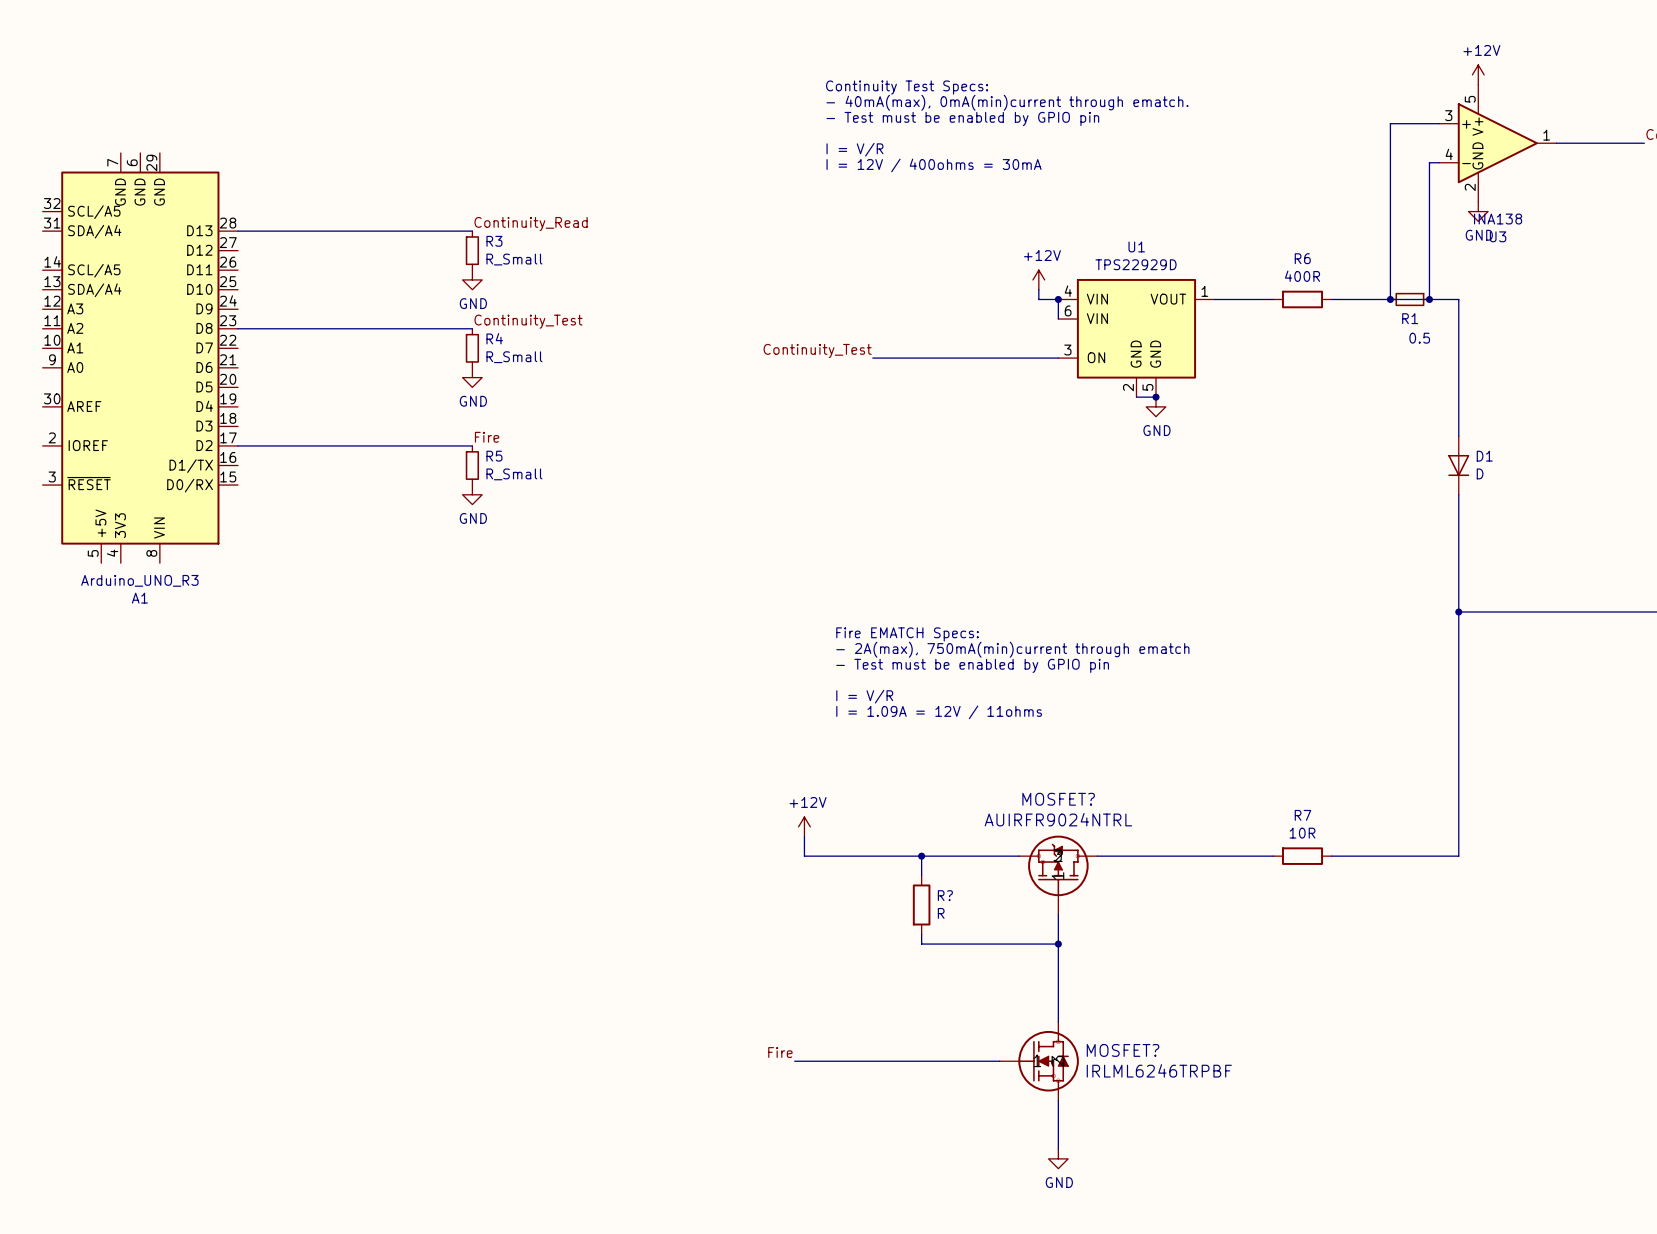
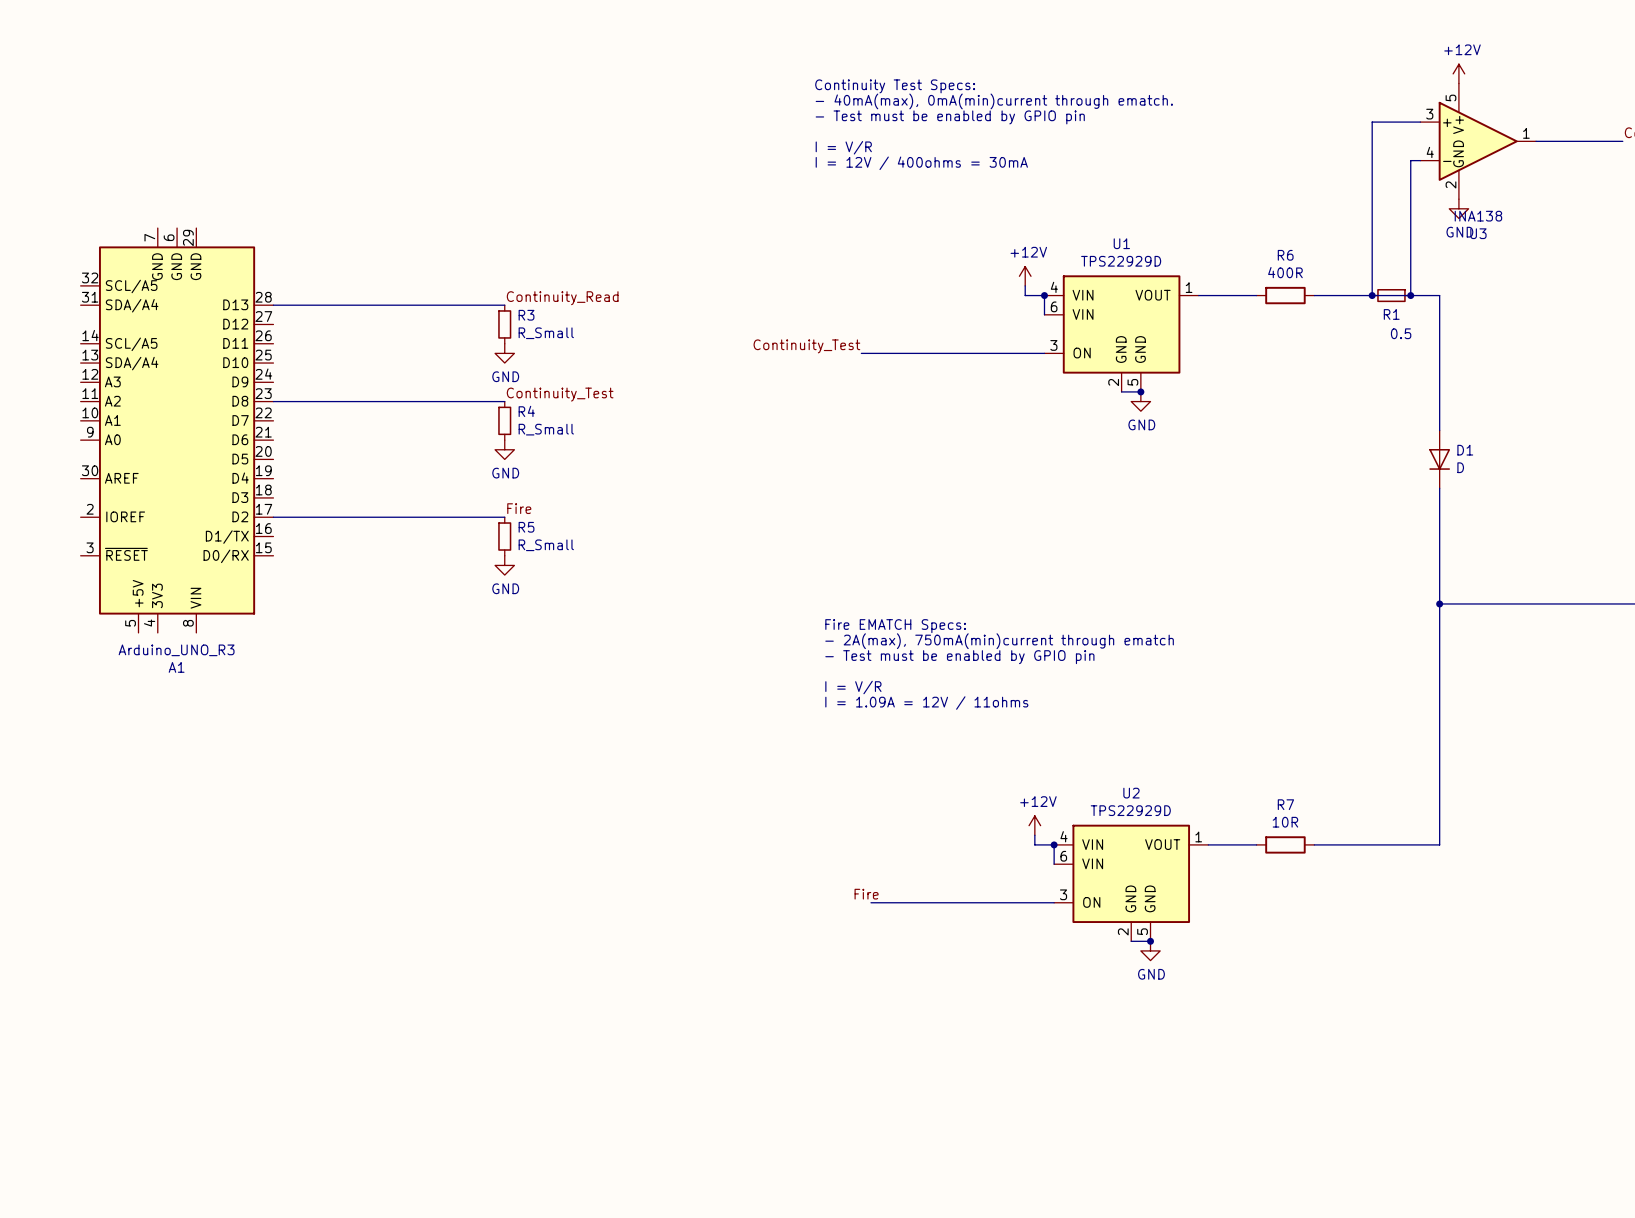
label position: Continuity_Read (531, 224) -> Continuity_Read (562, 298)
wire: (238, 231) (472, 231) -> (273, 305) (504, 305)
R3 position: (472, 250) -> (504, 324)
power symbol: GND (472, 279) -> none
label position: Continuity_Test (528, 321) -> Continuity_Test (560, 394)
wire: (238, 328) (472, 328) -> (273, 401) (504, 401)
R4 position: (472, 348) -> (504, 420)
A1 position: (140, 358) -> (177, 430)
power symbol: none -> GND (504, 353)
power symbol: GND (472, 377) -> none
label position: Fire (487, 437) -> Fire (519, 508)
wire: (238, 445) (472, 445) -> (273, 517) (504, 517)
power symbol: none -> GND (504, 449)
R5 position: (472, 465) -> (504, 536)
power symbol: GND (472, 494) -> none
power symbol: none -> GND (504, 565)
power symbol: +12V (804, 826) -> none
wire: (804, 836) (804, 856) (1019, 856) -> none
power symbol: none -> +12V (1034, 825)
wire: none -> (1034, 835) (1034, 844) (1054, 844) (1054, 864)
wire: (921, 856) (921, 875) -> none
junction: (921, 856) -> none
junction: none -> (1054, 844)
MOSFET?: AUIRFR9024NTRL (1058, 875) -> none
U2: none -> TPS22929D (1131, 883)
R?: R (921, 904) -> none
wire: none -> (871, 902) (1054, 902)
wire: (1058, 914) (1058, 1022) -> none
wire: (921, 934) (921, 944) (1058, 944) -> none
junction: (1058, 944) -> none
wire: none -> (1131, 941) (1150, 941)
junction: none -> (1150, 941)
power symbol: none -> GND (1150, 950)
label position: Fire (780, 1052) -> Fire (866, 894)
wire: (794, 1061) (999, 1061) -> none
MOSFET?: IRLML6246TRPBF (1039, 1061) -> none
wire: (1058, 1100) (1058, 1149) -> none
power symbol: GND (1058, 1158) -> none

